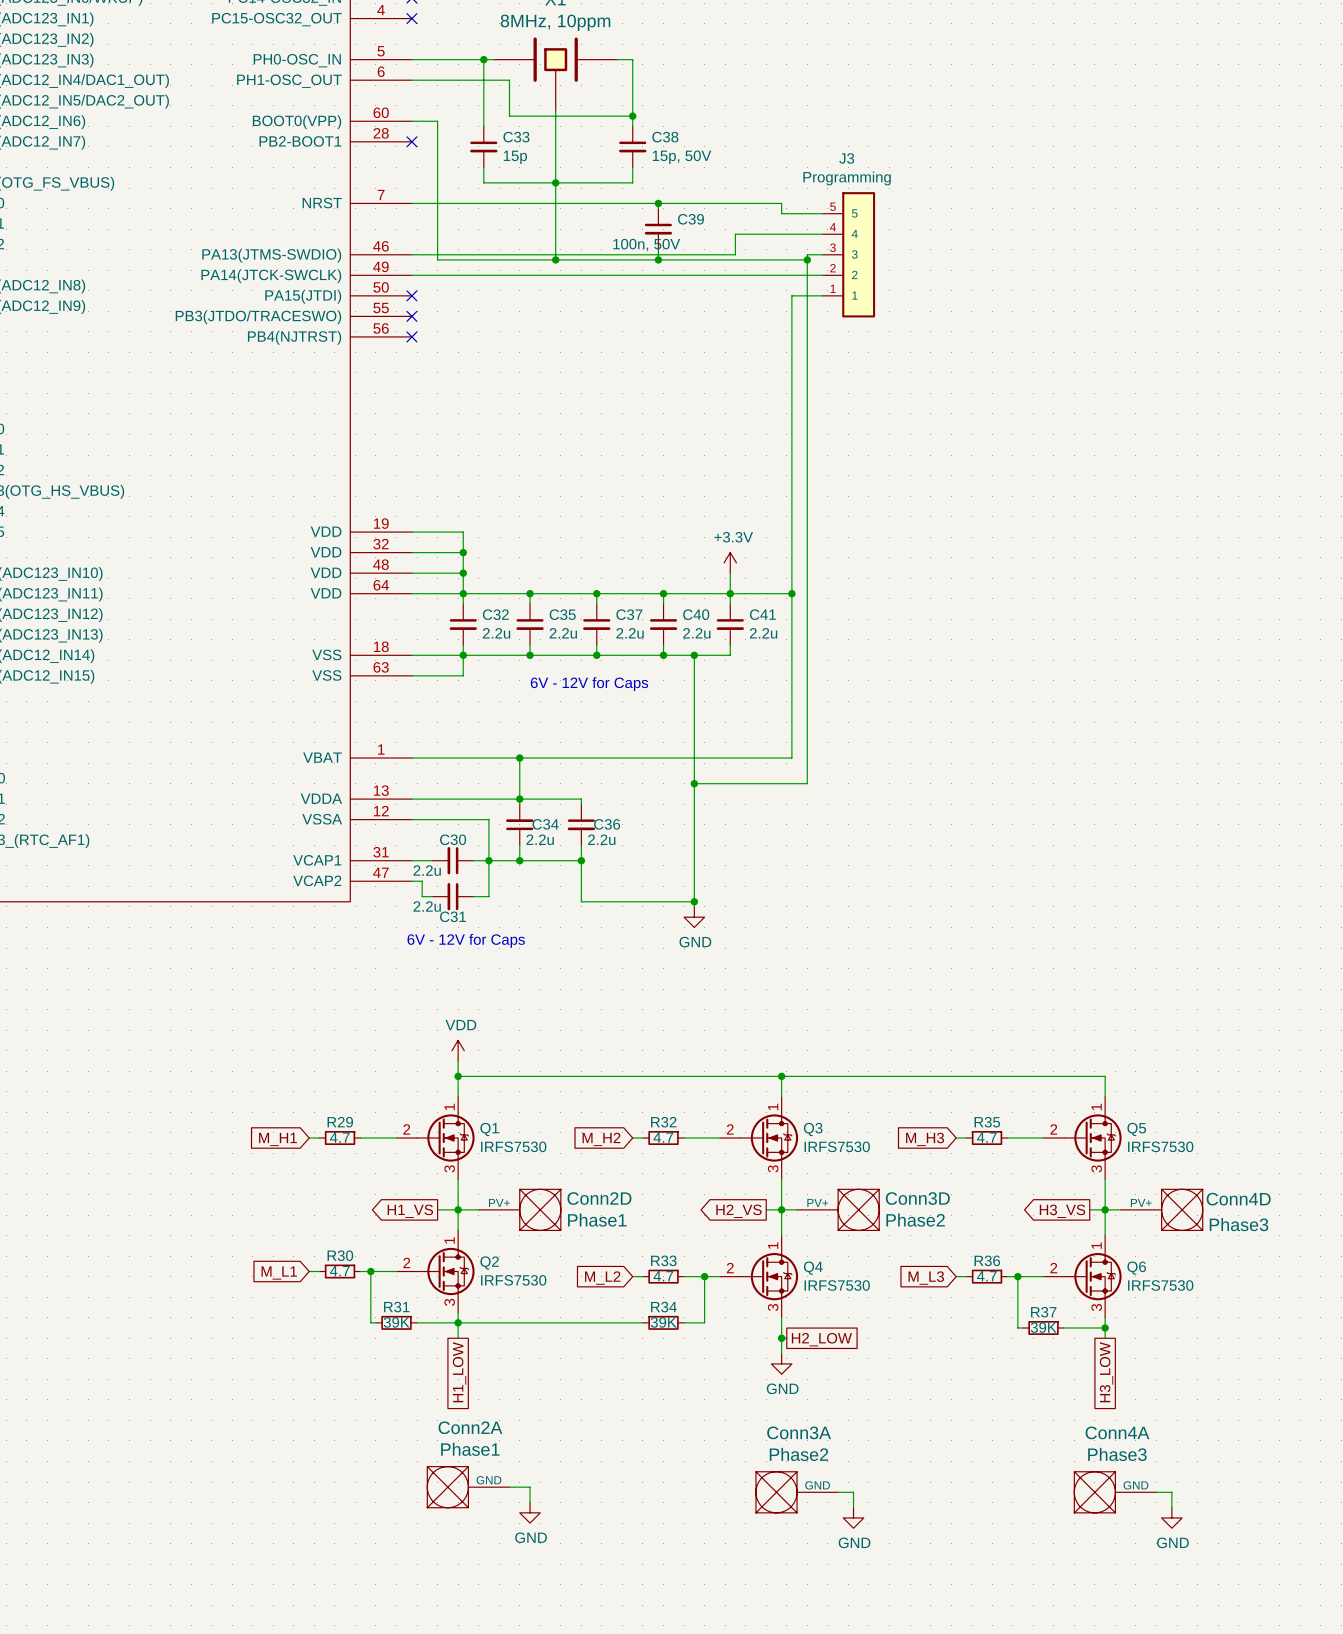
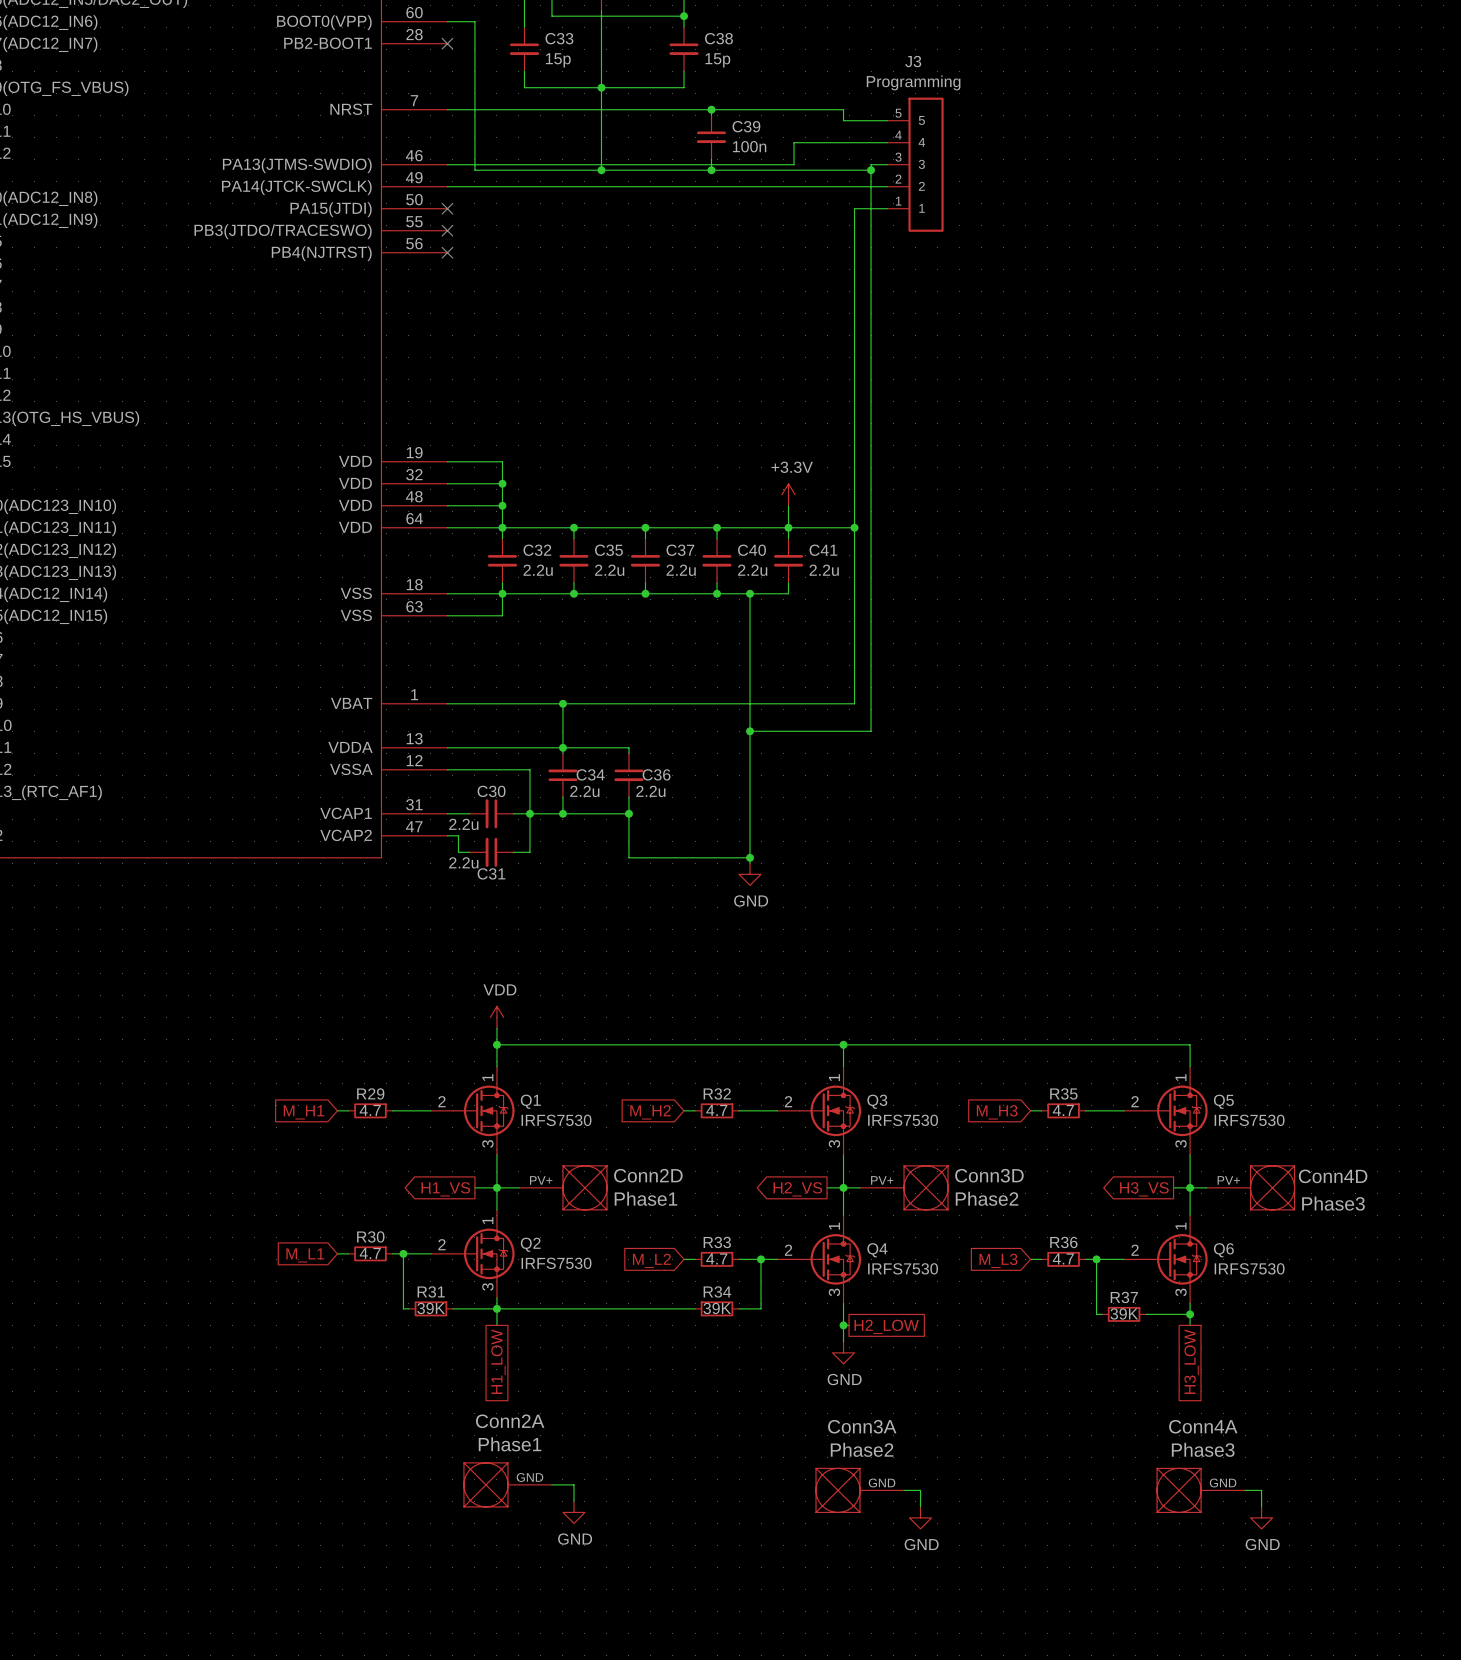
C38 value: 15p, 50V (682, 157) -> 15p (717, 60)
C39 value: 100n, 50V (646, 245) -> 100n (749, 146)
text: 6V - 12V for Caps (589, 684) -> none
text: 6V - 12V for Caps (466, 940) -> none

